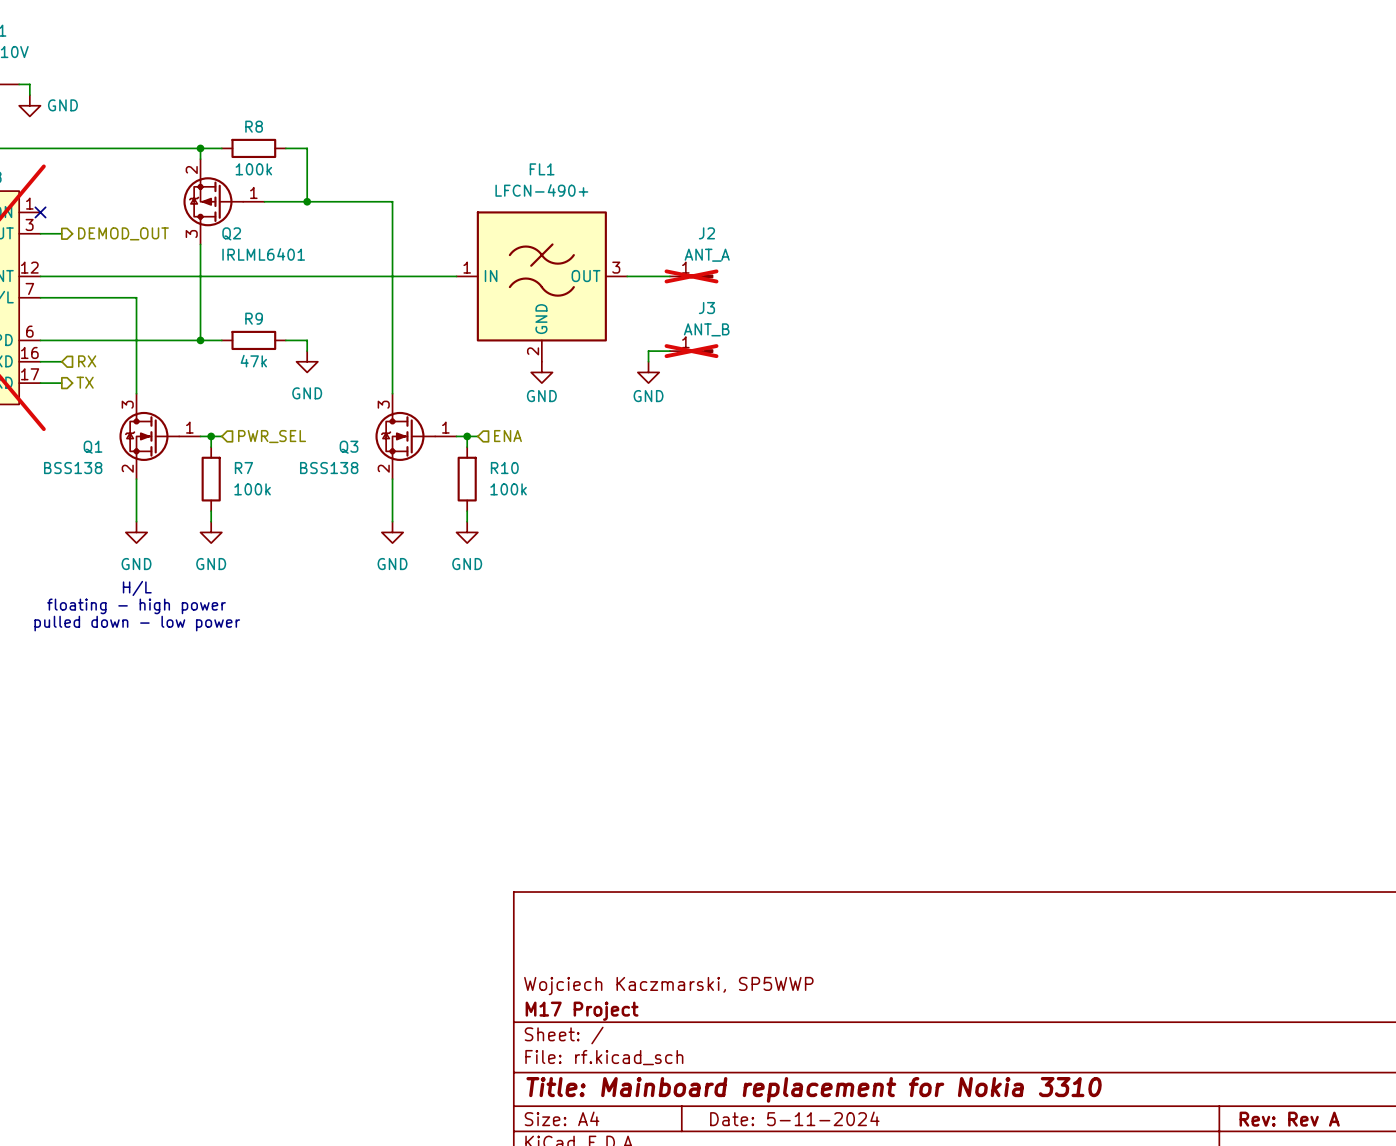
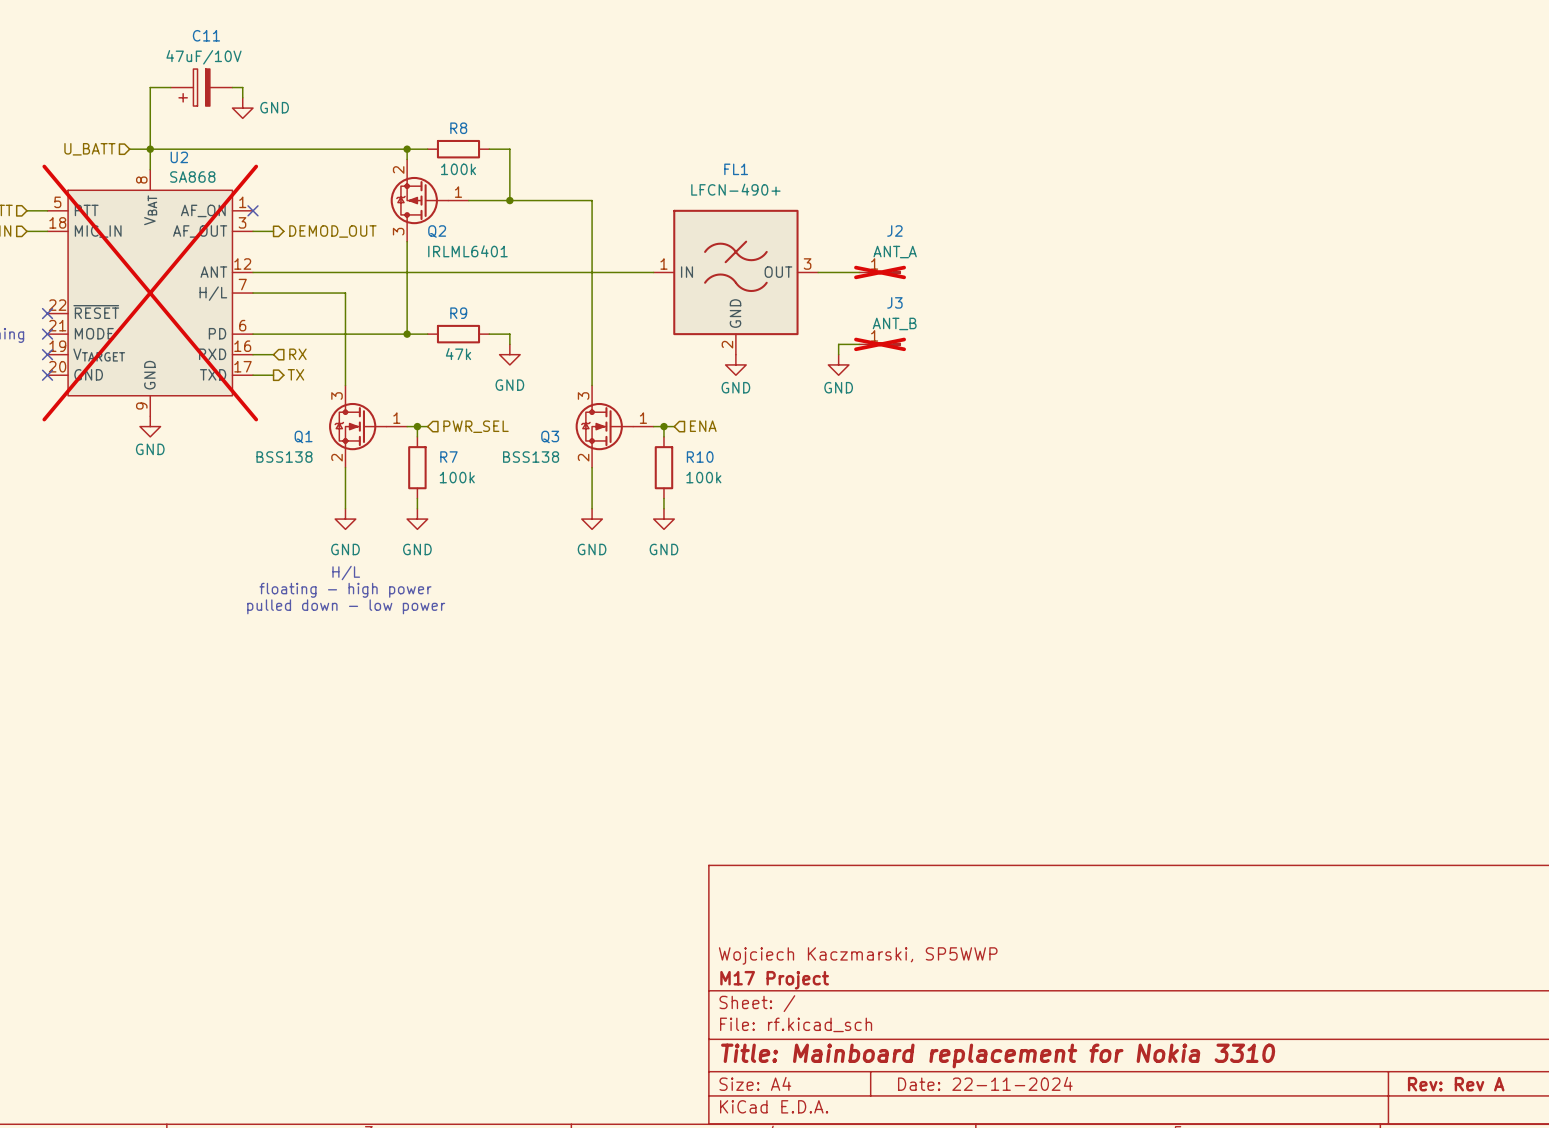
title block: Date: 5-11-2024 (794, 1118) -> Date: 22-11-2024 (985, 1083)

